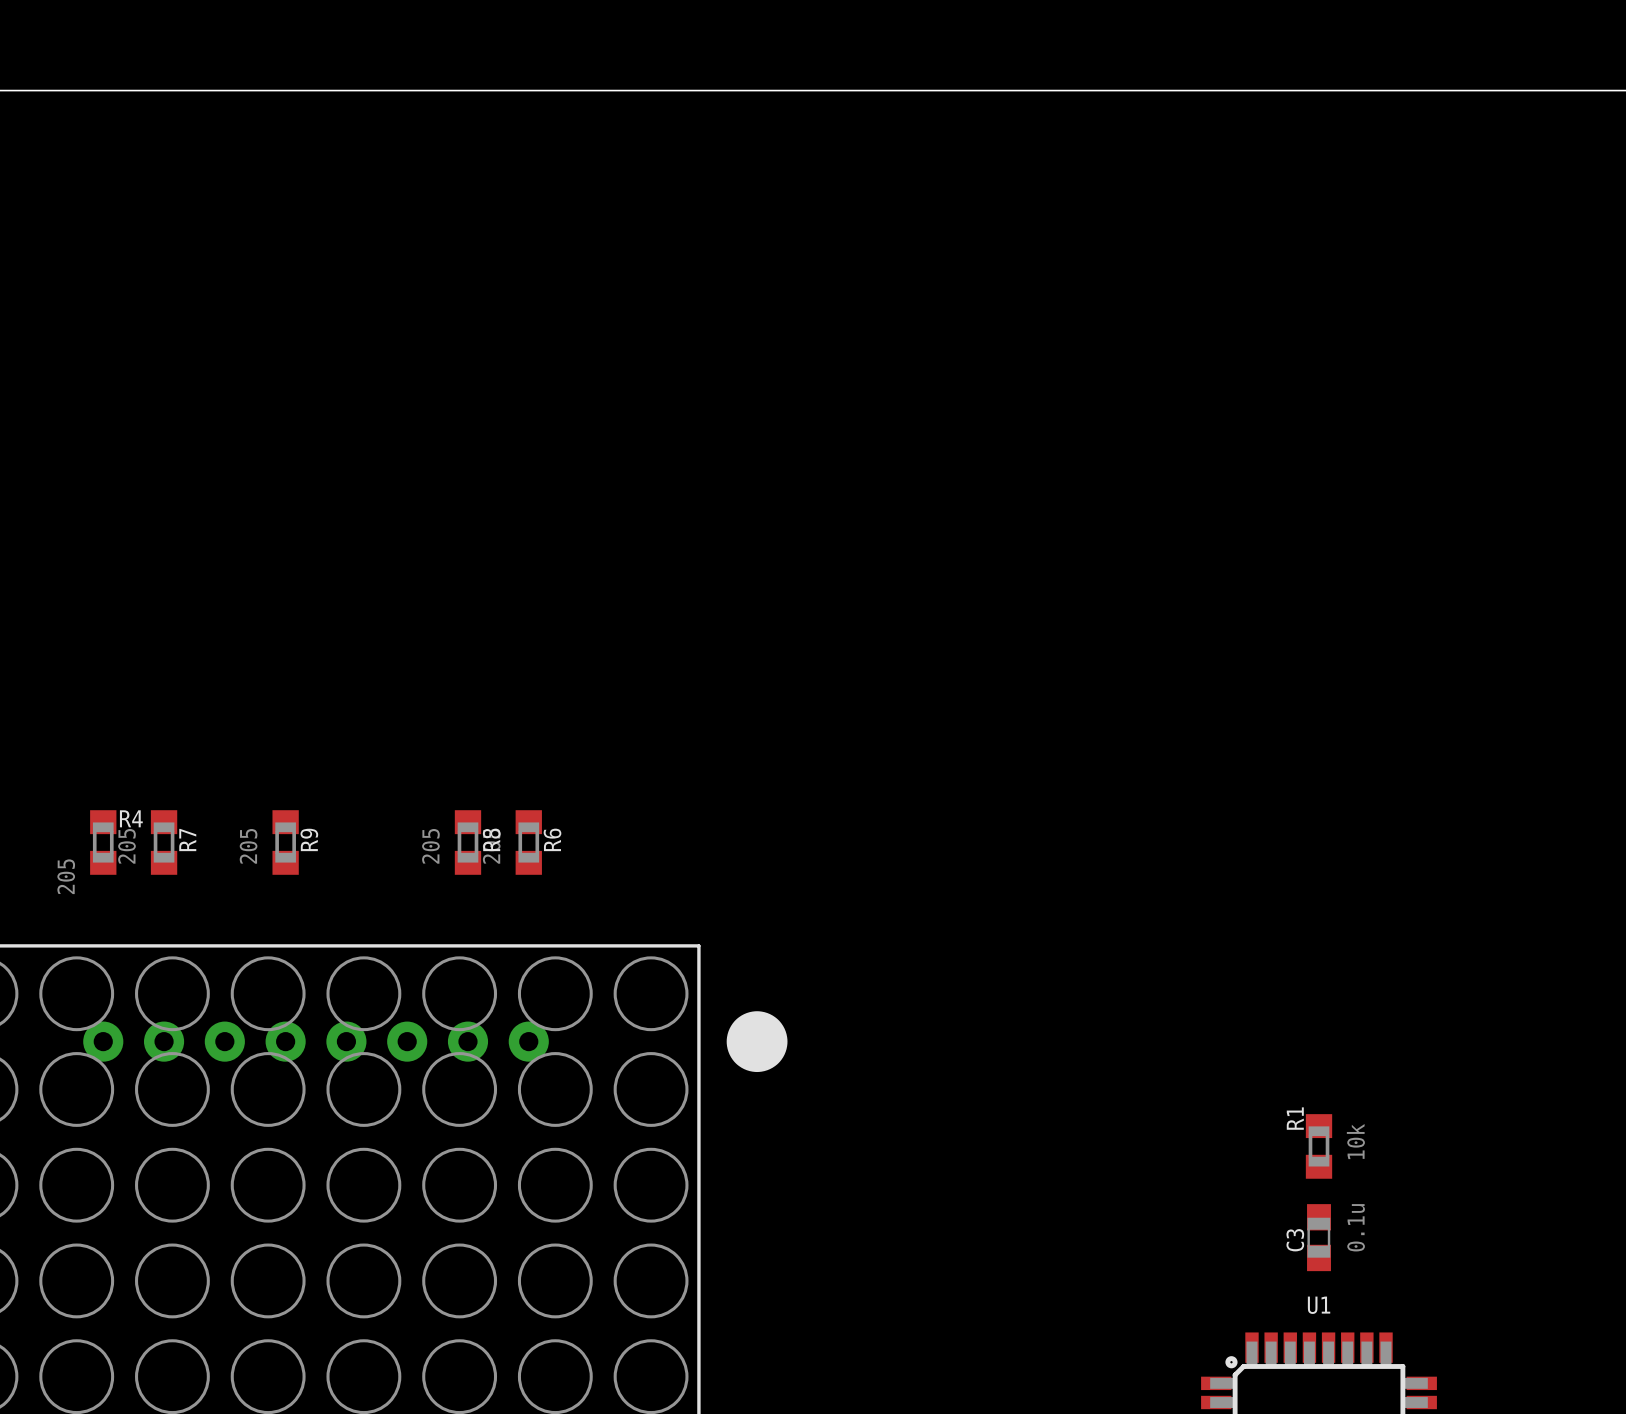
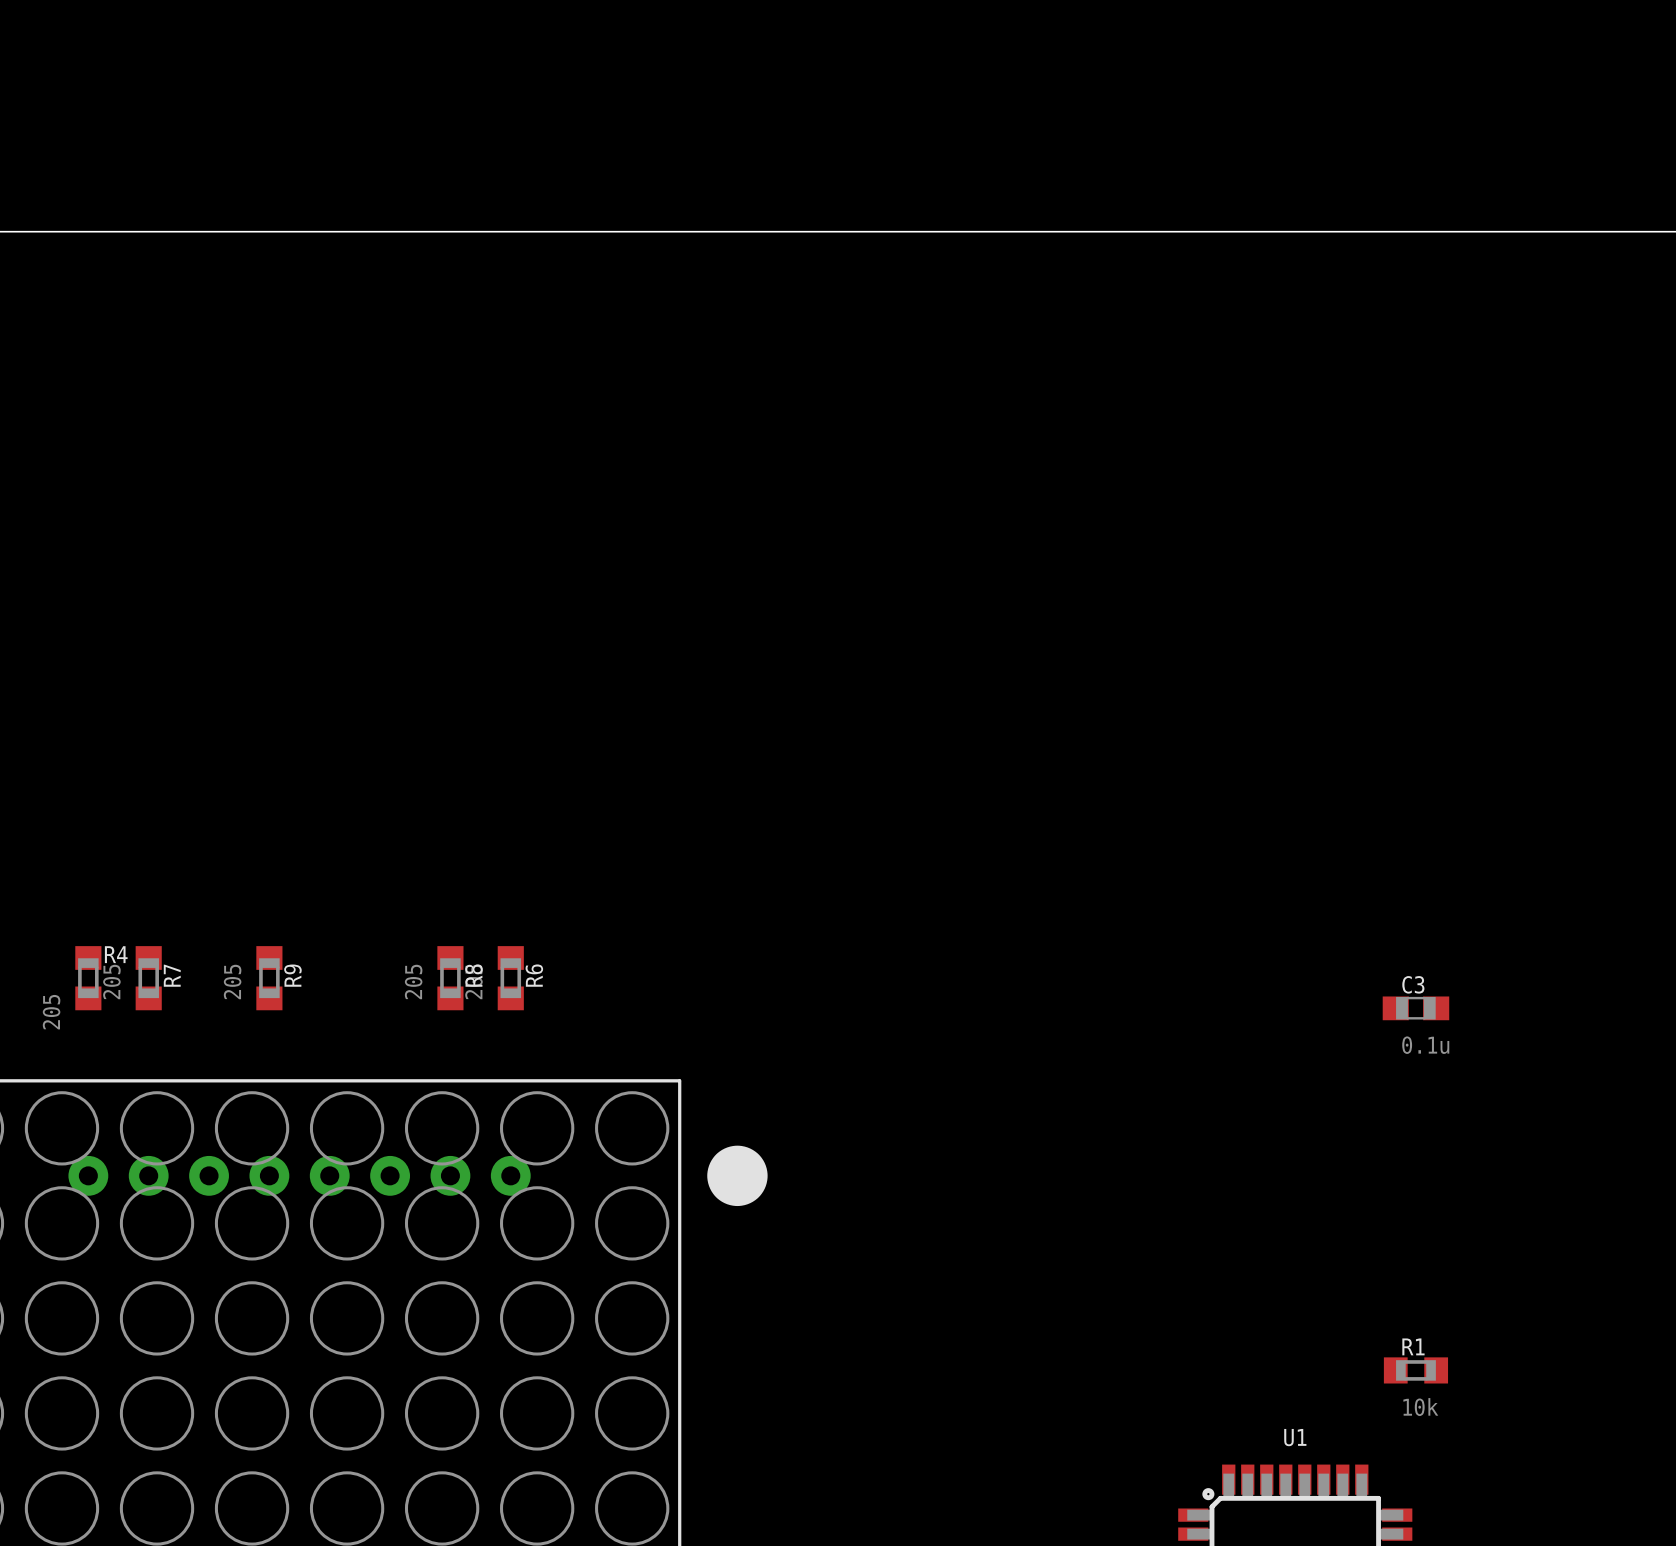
R1 rotation: 0° (1319, 1146) -> 90° clockwise (1415, 1370)
R1 position: (1319, 1146) -> (1415, 1370)
C3 rotation: 0° (1319, 1237) -> 90° clockwise (1415, 1008)
C3 position: (1319, 1237) -> (1415, 1008)

